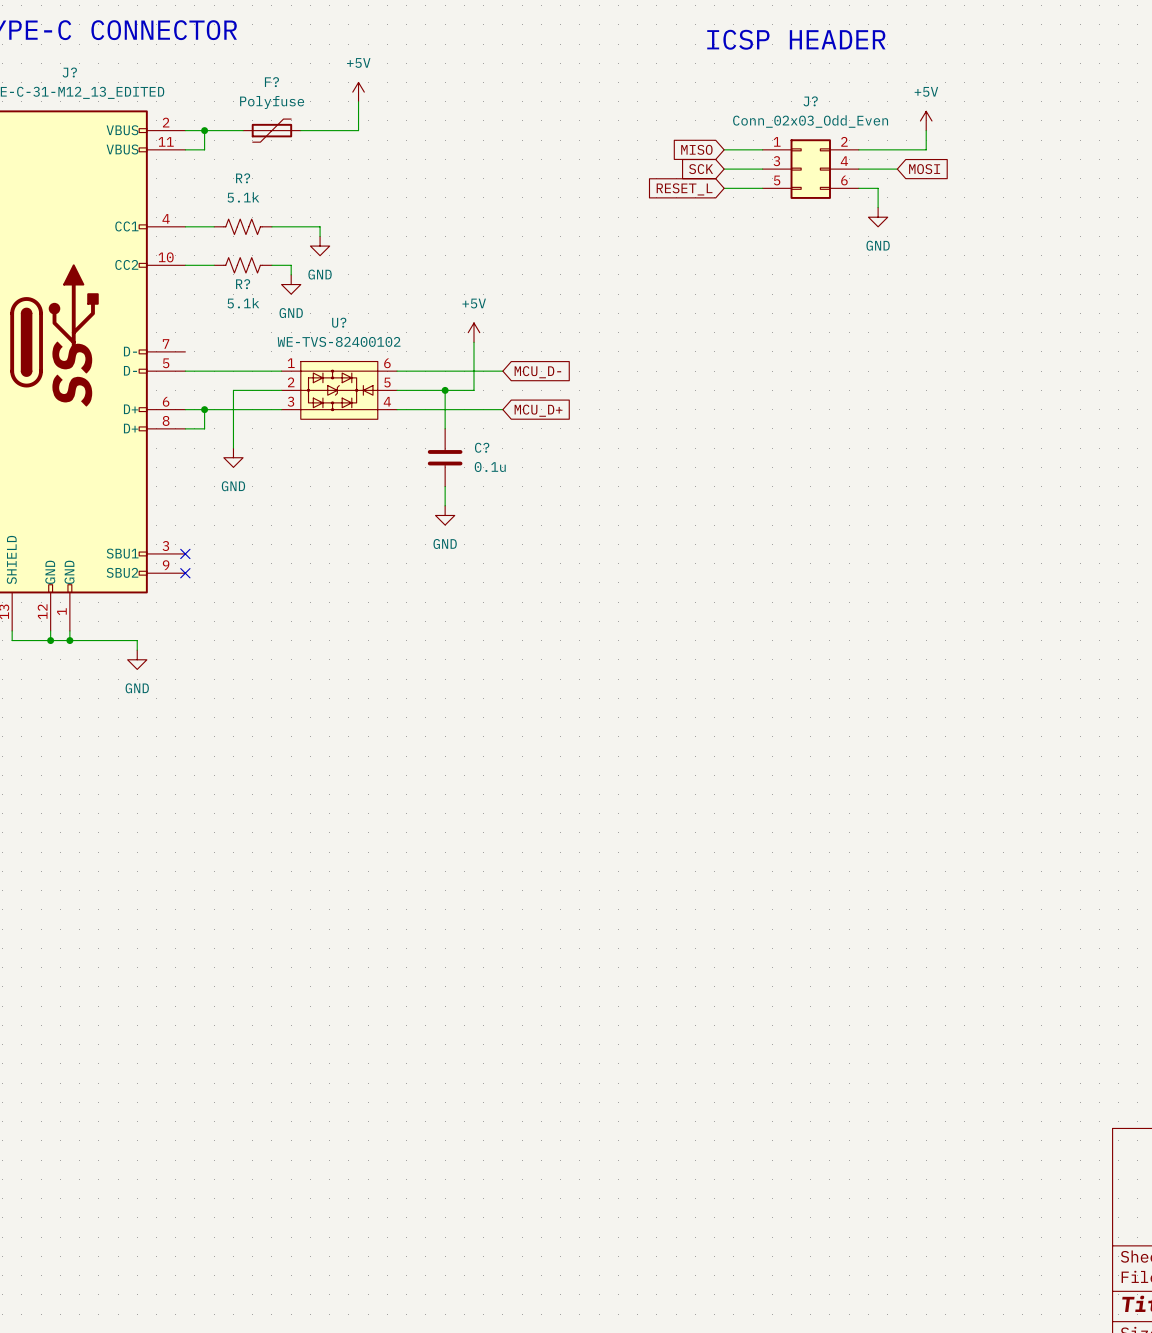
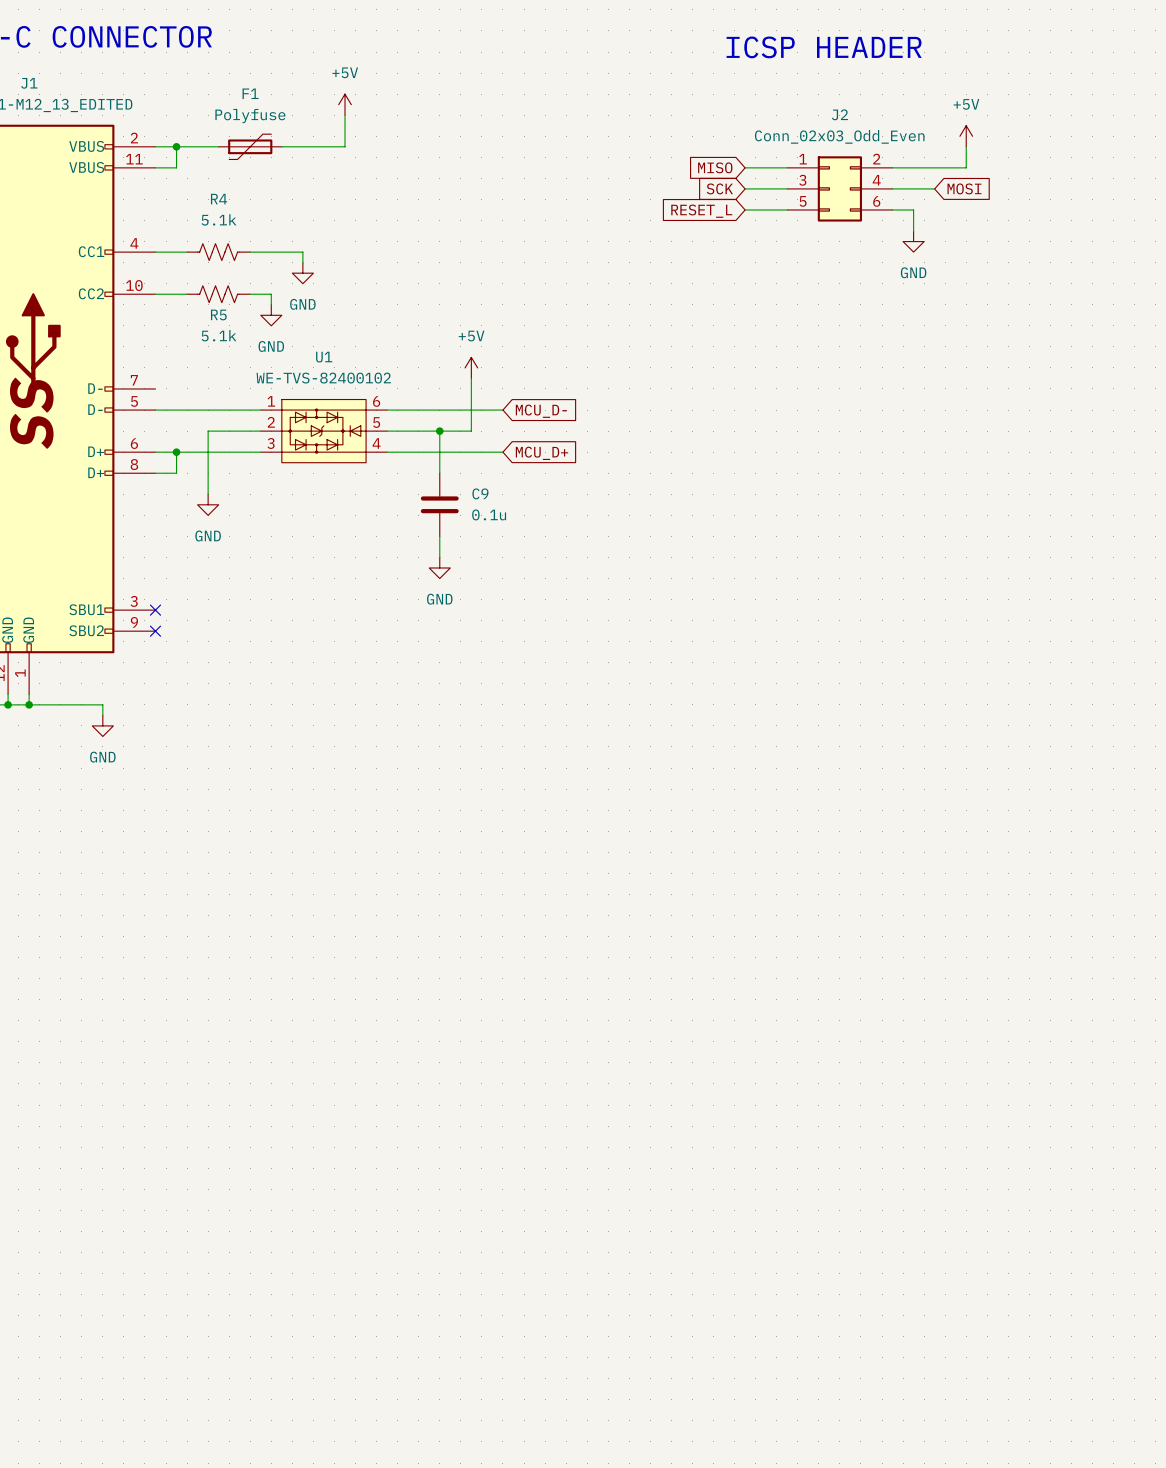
J? name: J? (69, 72) -> J1 (29, 83)
F? name: F? (271, 82) -> F1 (250, 93)
J? name: J? (810, 101) -> J2 (839, 114)
R? name: R? (243, 178) -> R4 (219, 199)
R? name: R? (243, 284) -> R5 (218, 314)
U? name: U? (339, 322) -> U1 (324, 357)
C? name: C? (482, 447) -> C9 (480, 493)

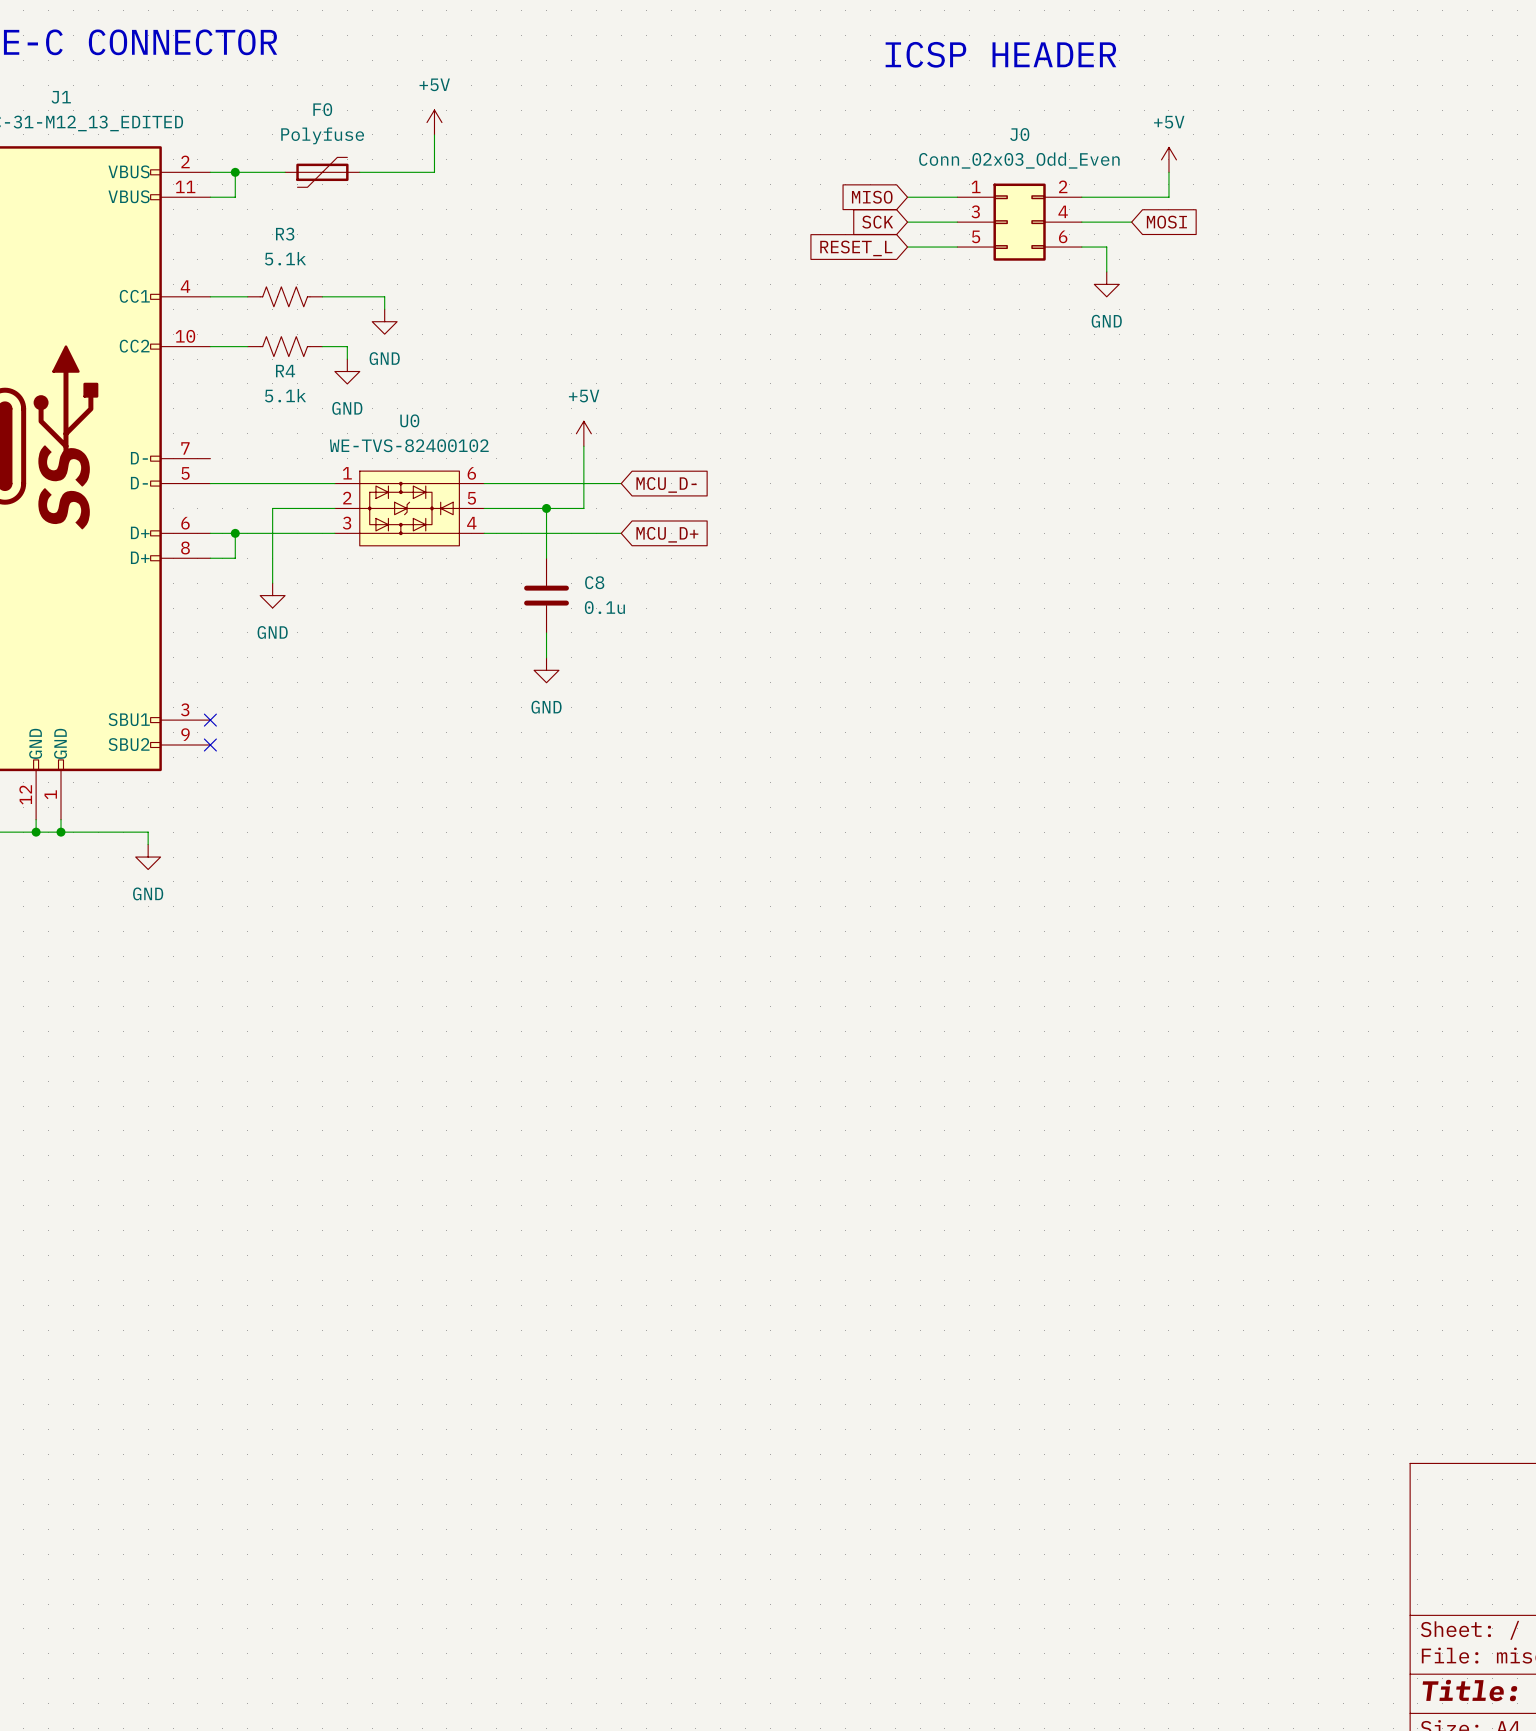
F1 name: F1 (250, 93) -> F0 (322, 109)
J2 name: J2 (839, 114) -> J0 (1019, 134)
R4 name: R4 (219, 199) -> R3 (285, 234)
R5 name: R5 (218, 314) -> R4 (285, 371)
U1 name: U1 (324, 357) -> U0 (409, 420)
C9 name: C9 (480, 493) -> C8 (594, 582)

